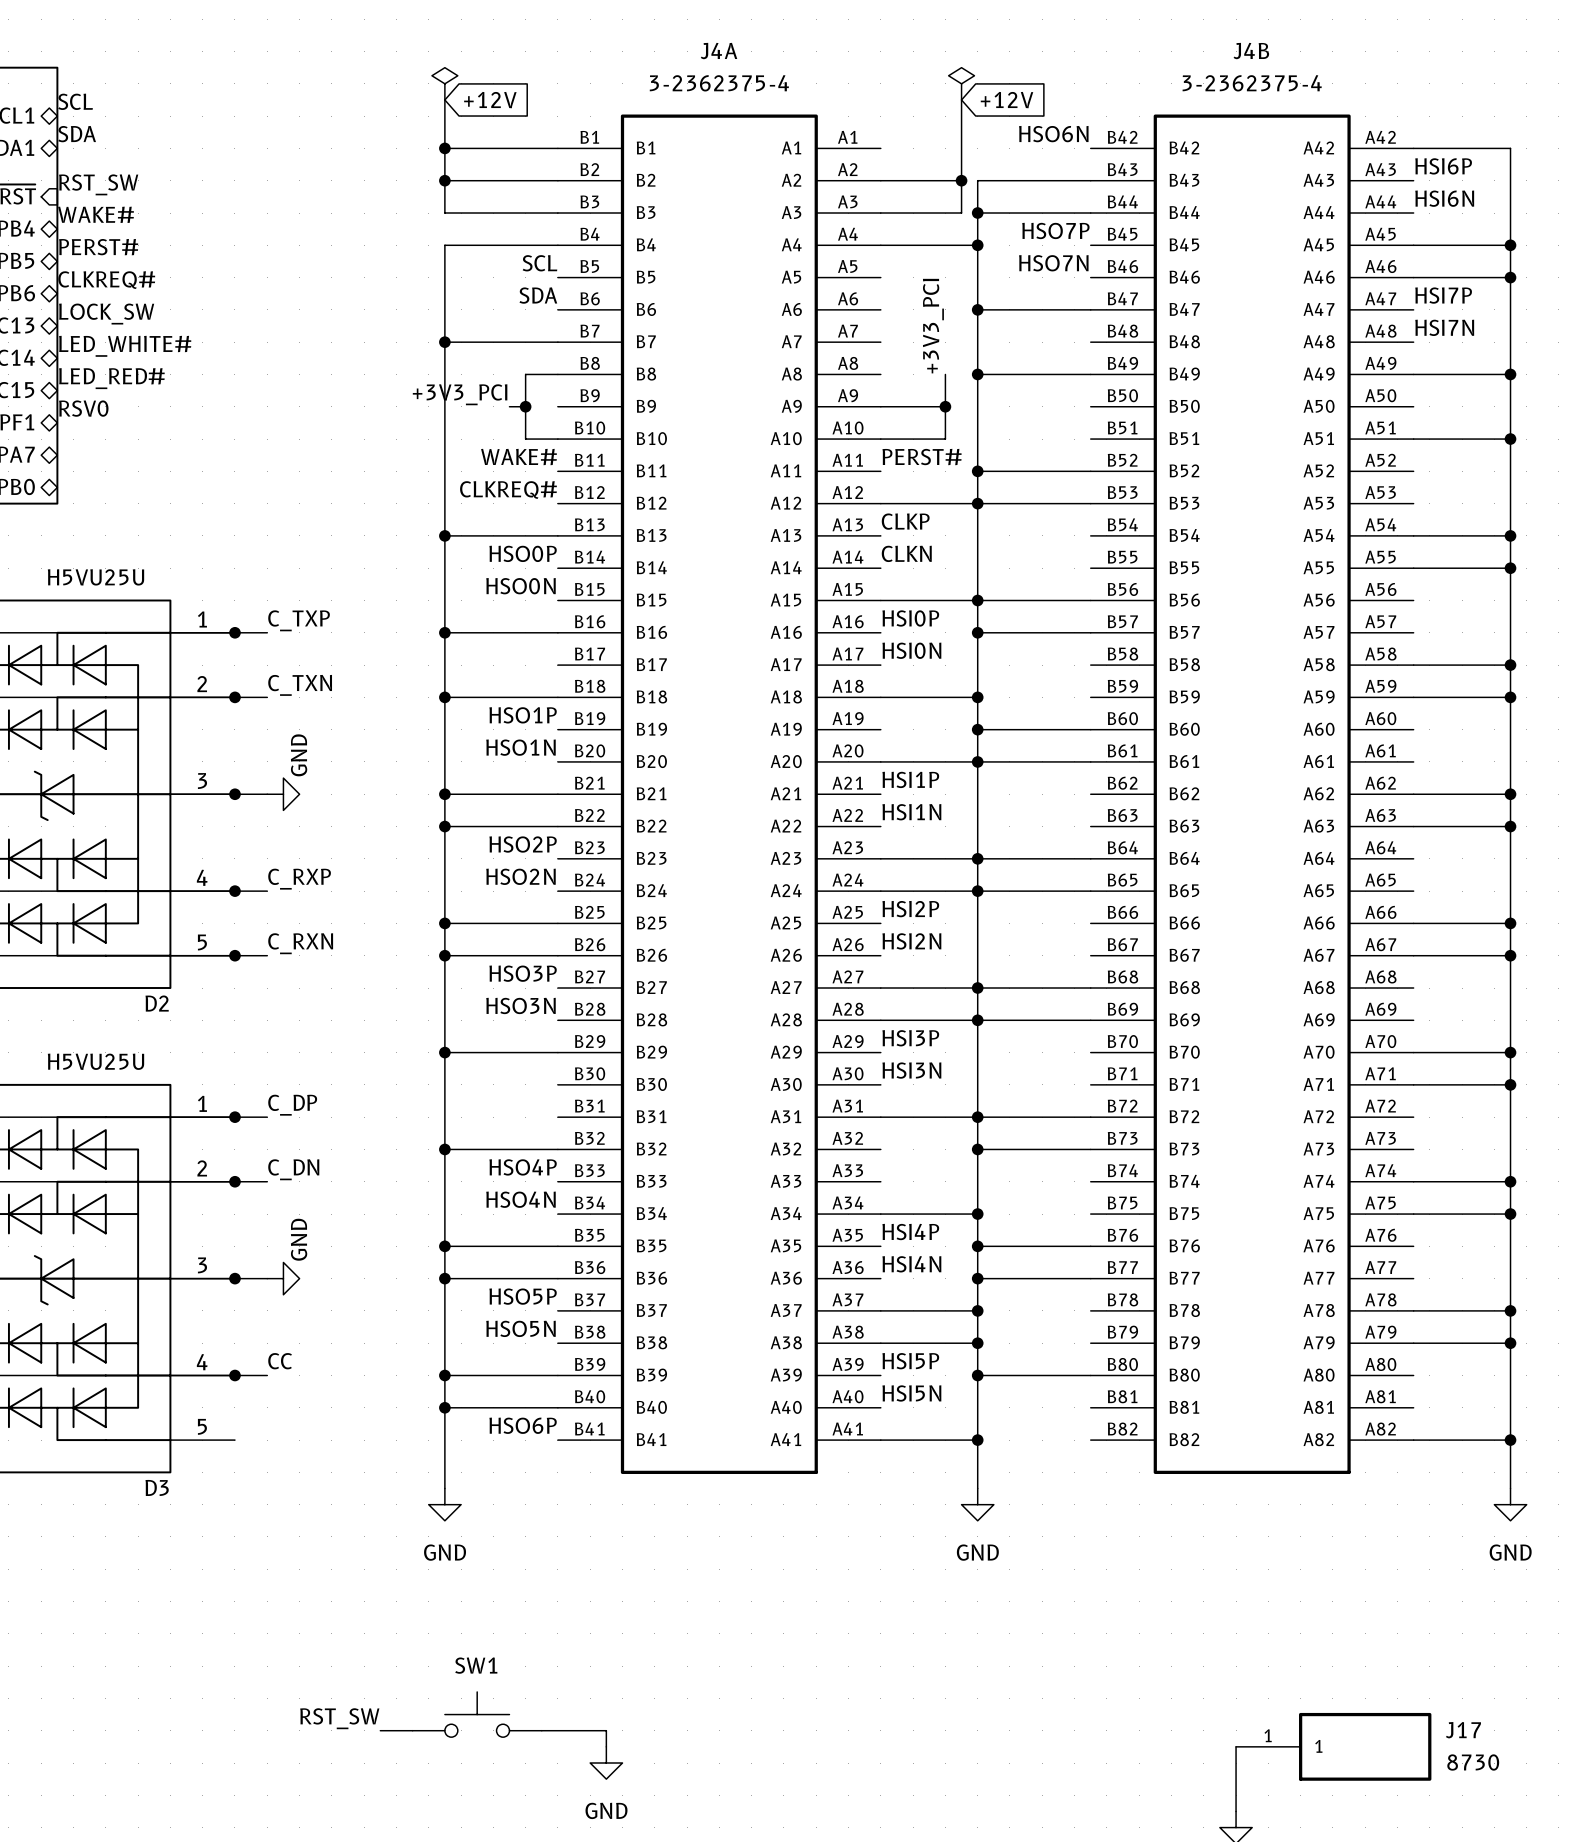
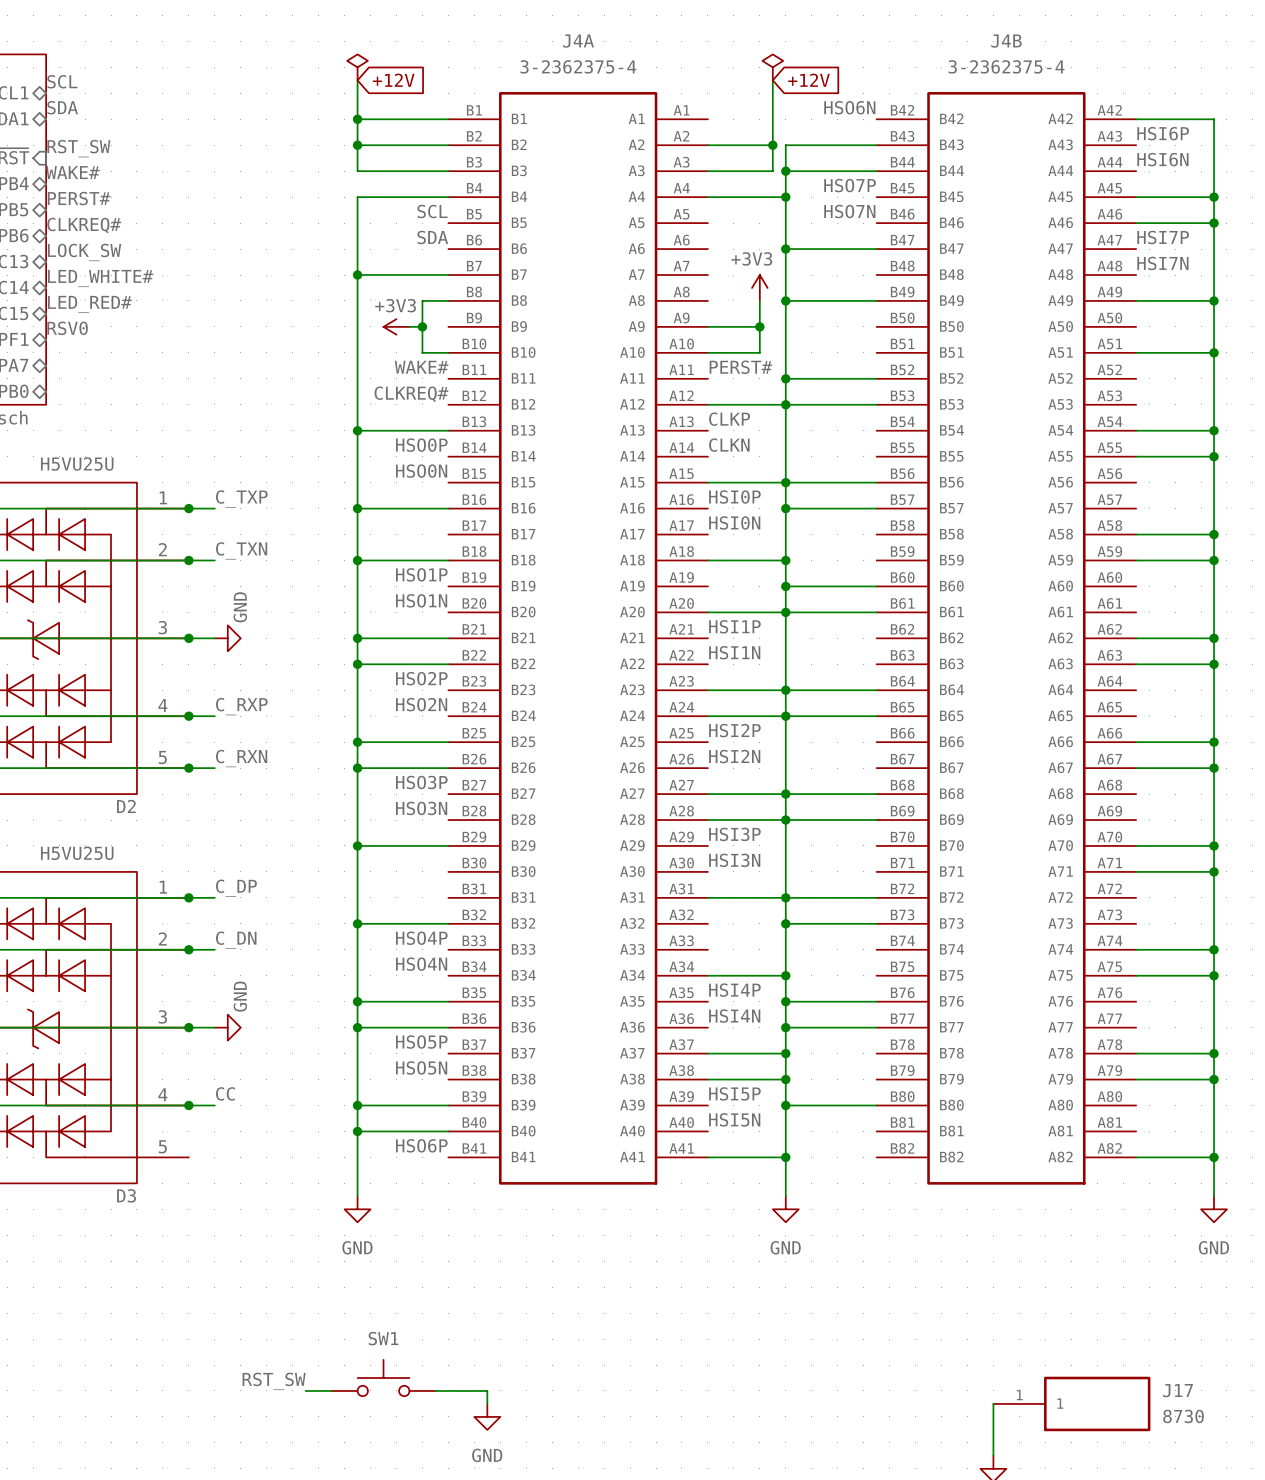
label: +3V3_PCI (933, 326) -> none
power symbol: none -> +3V3 (759, 287)
label: +3V3_PCI (460, 394) -> none
power symbol: none -> +3V3 (396, 326)

